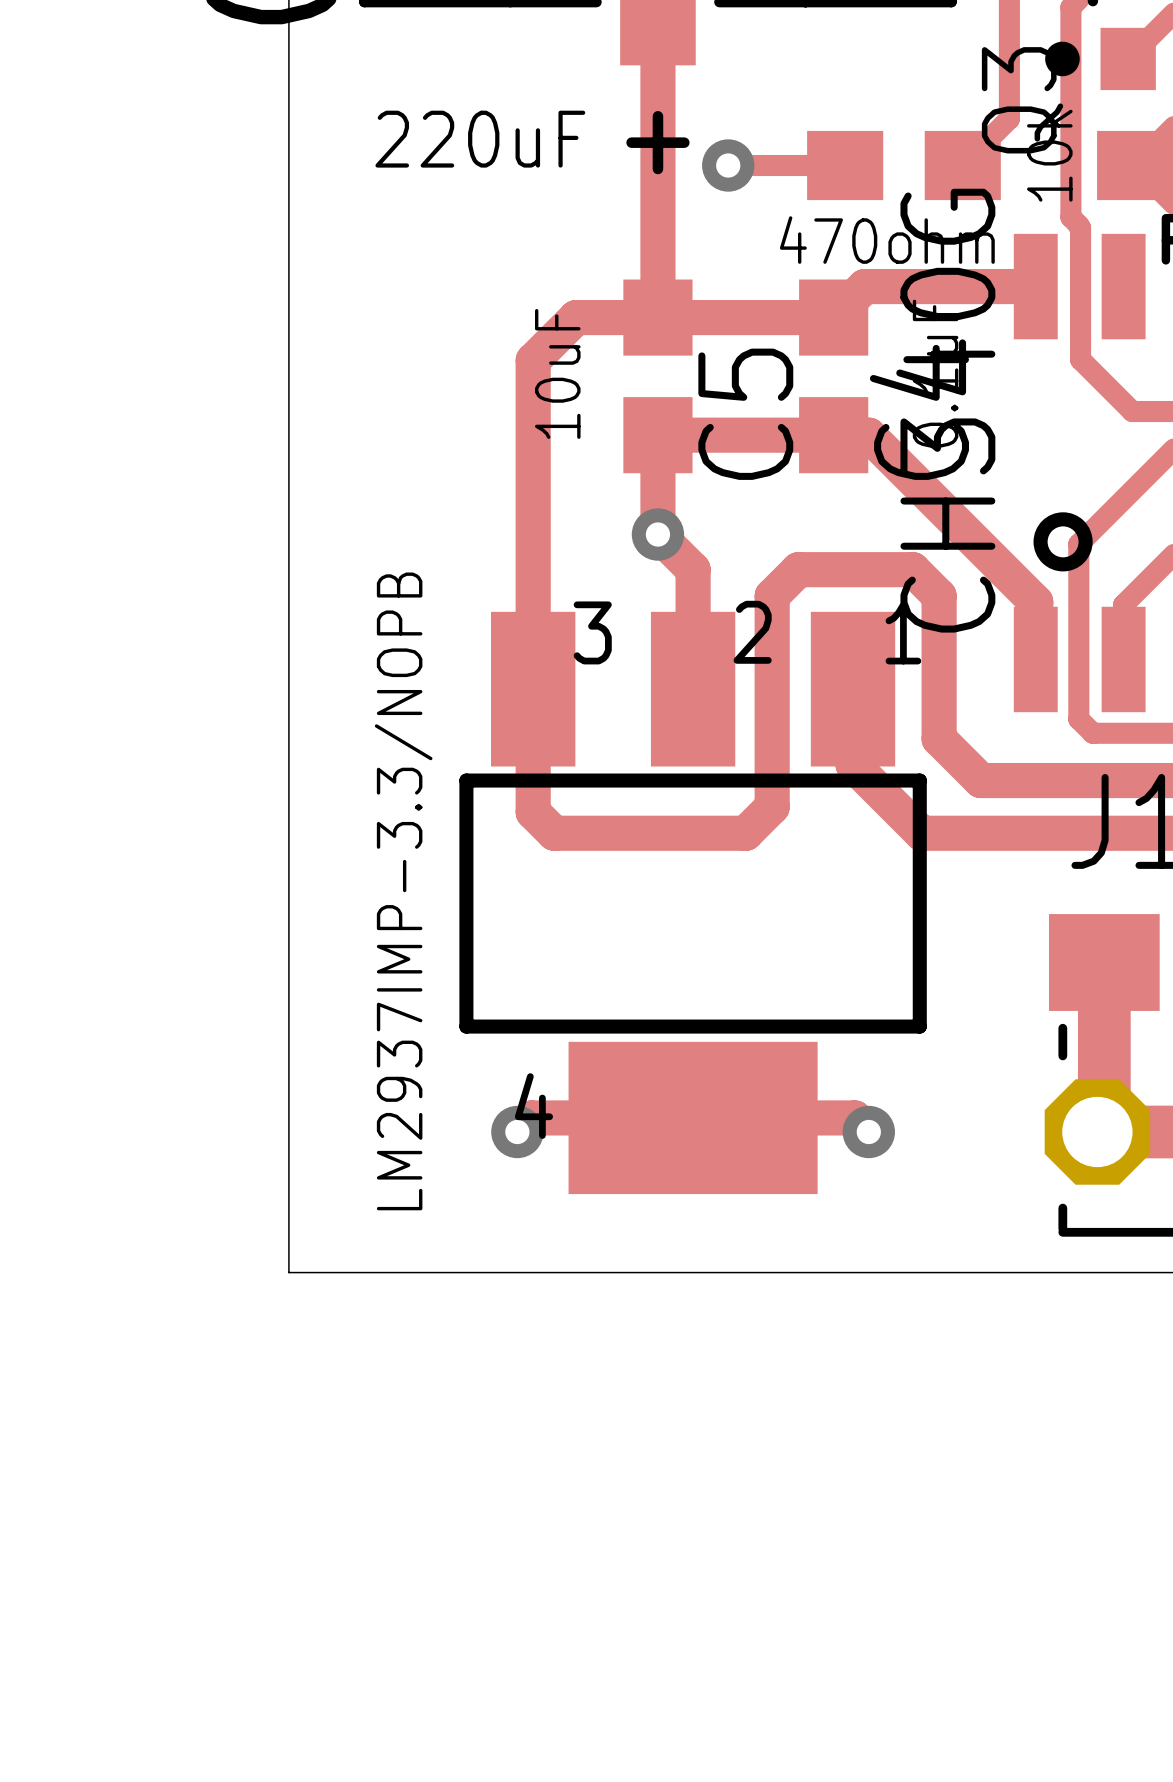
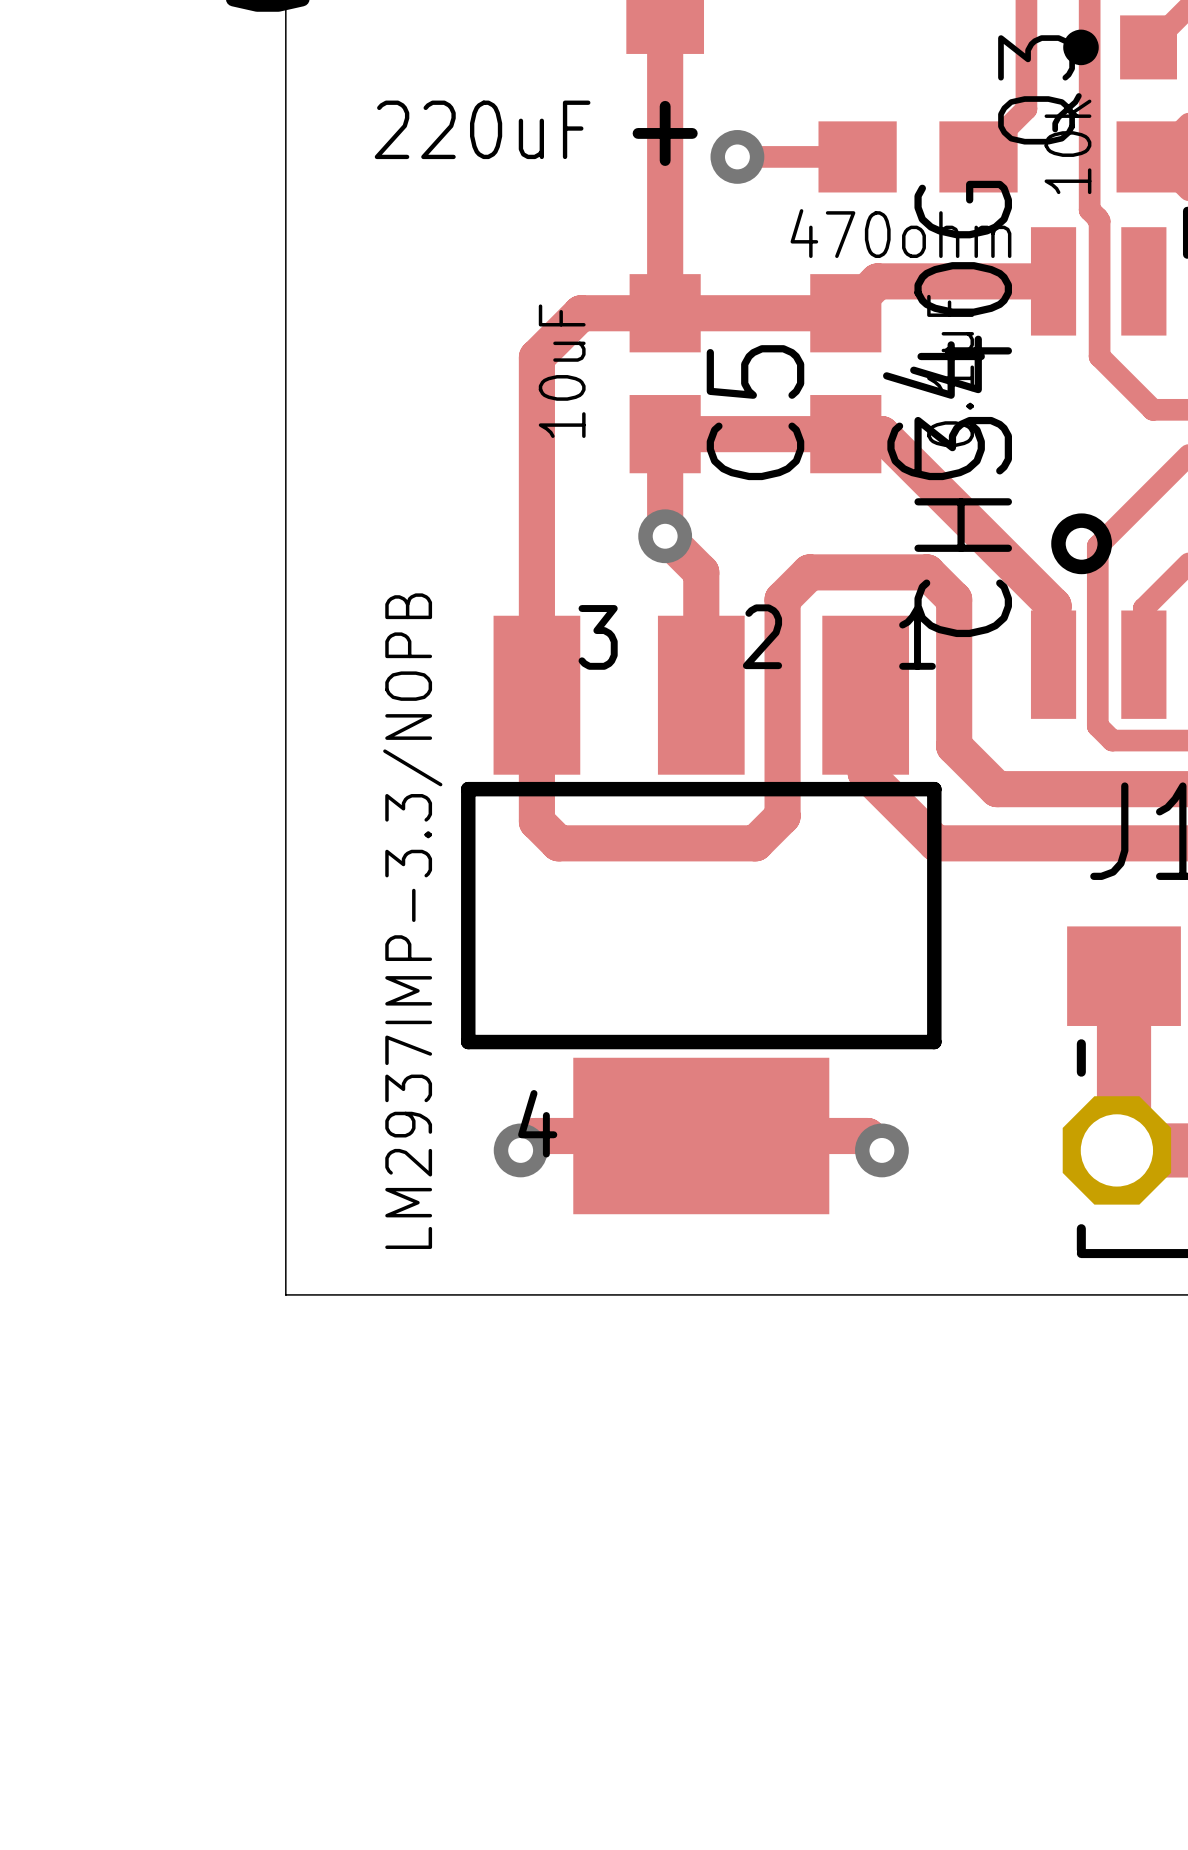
text position: LM2937IMP-3.3/NOPB (403, 891) -> LM2937IMP-3.3/NOPB (412, 921)

